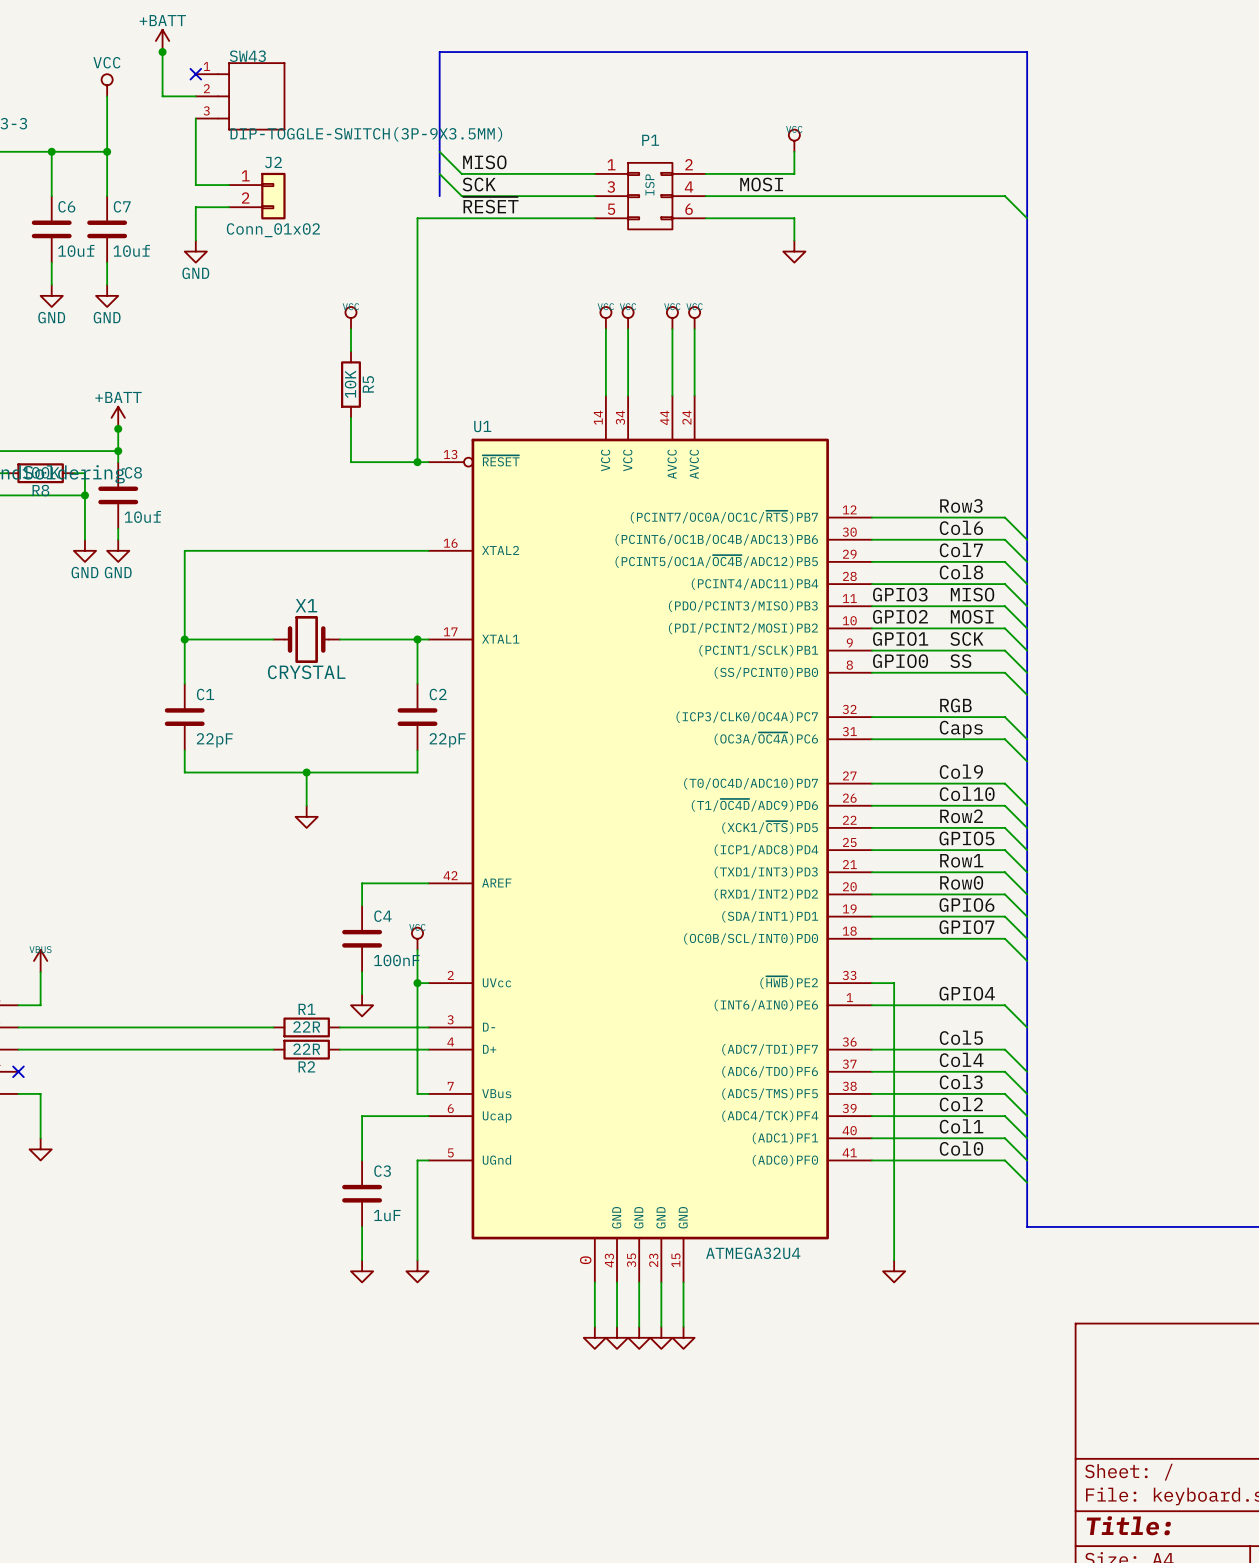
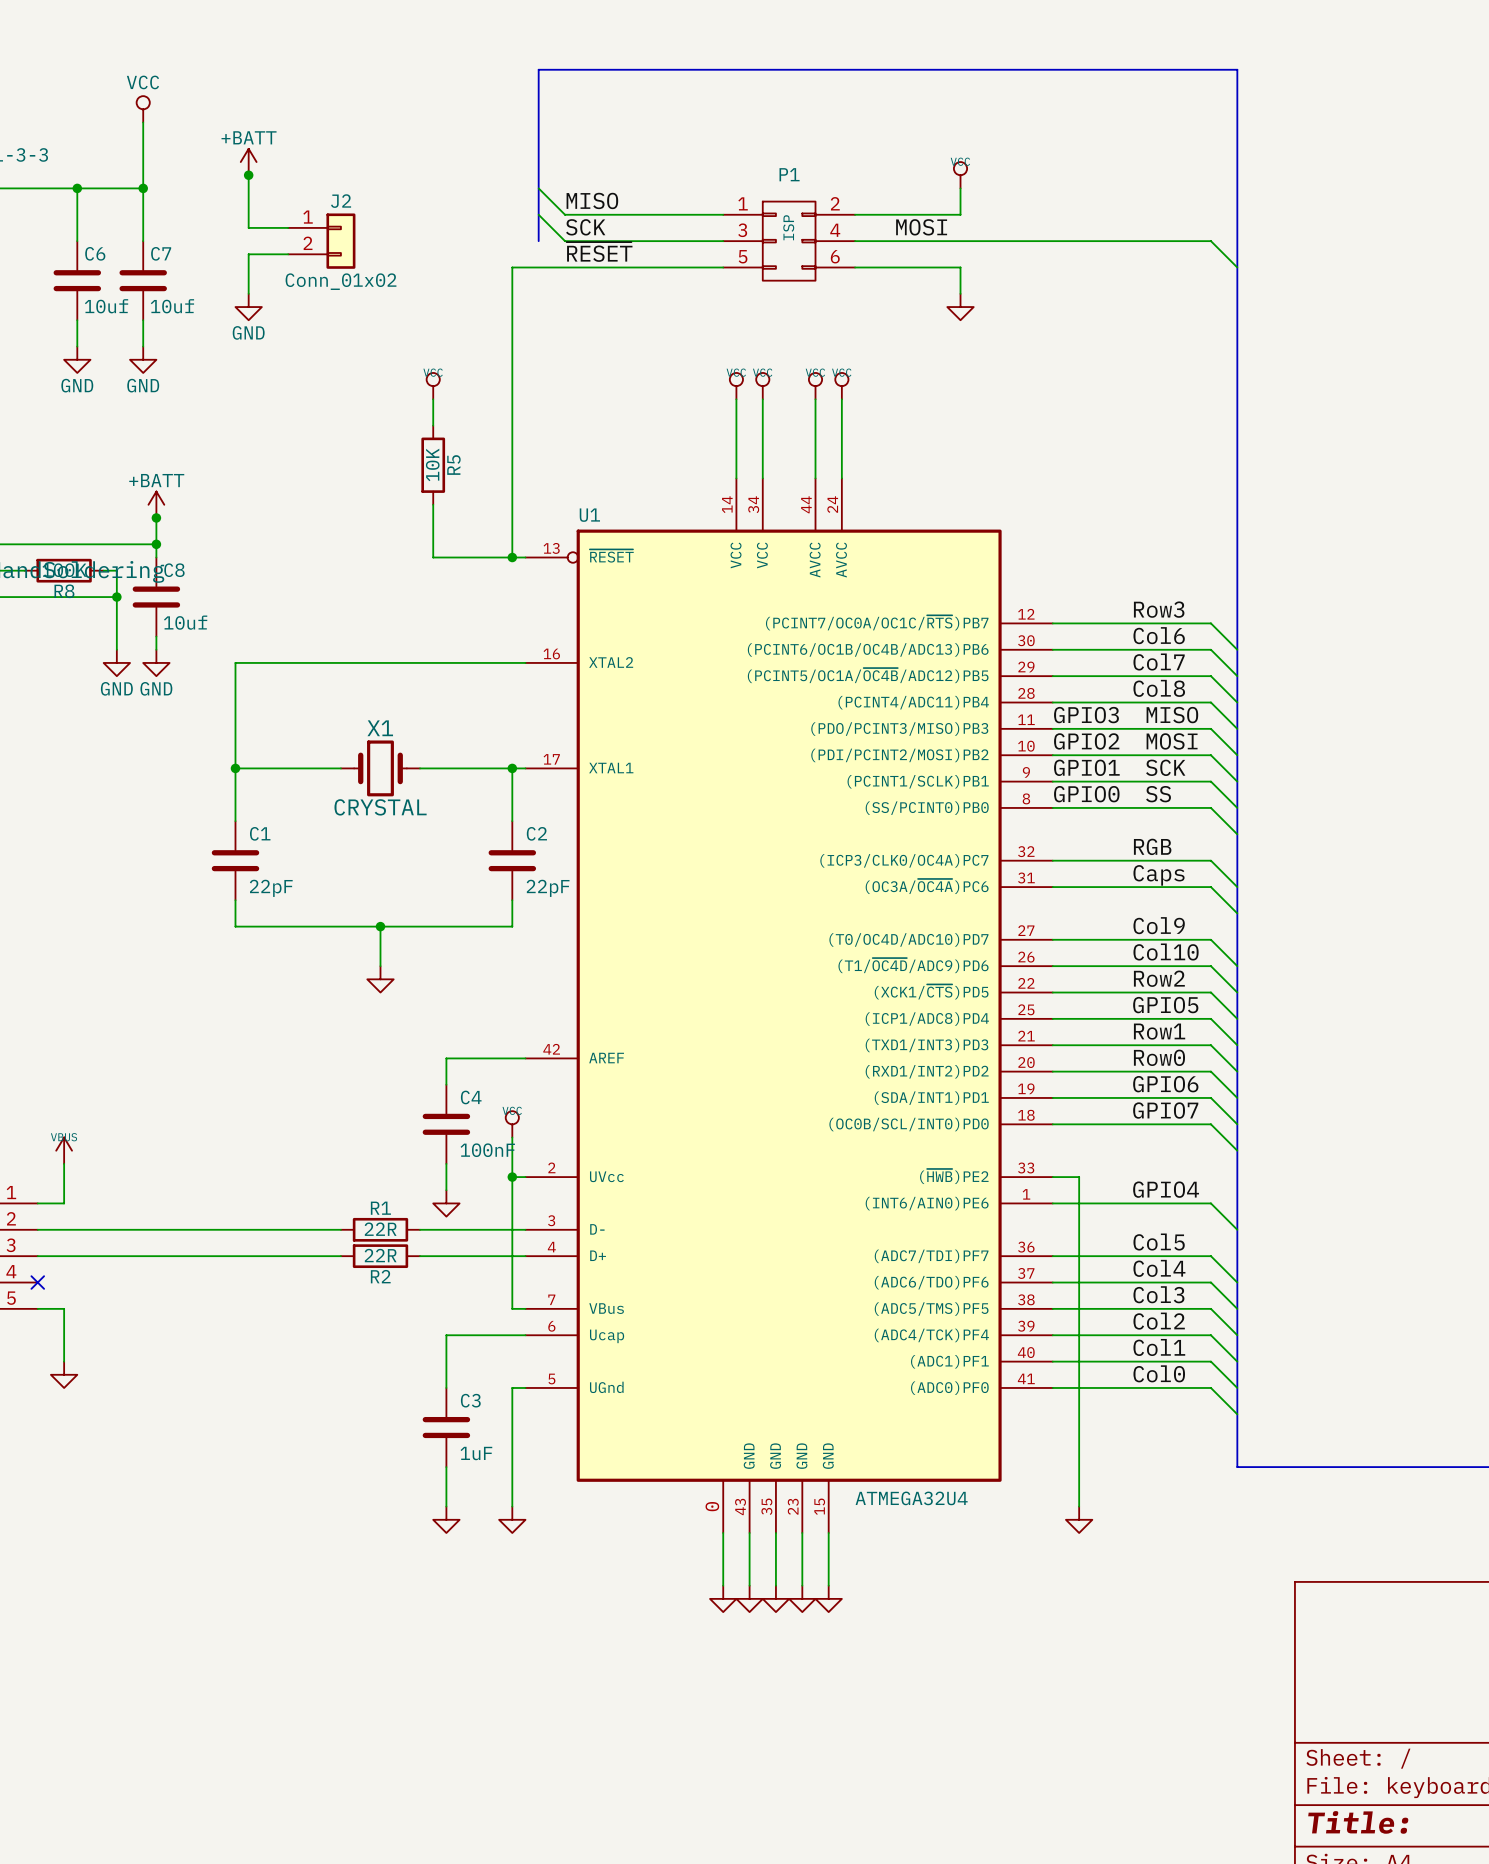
power symbol position: +BATT (162, 40) -> +BATT (248, 162)
wire: (162, 52) (162, 96) (195, 96) -> none
junction: (162, 52) -> none
no-connect mark: (195, 74) -> none
SW43: DIP-TOGGLE-SWITCH(3P-9X3.5MM) (240, 96) -> none
junction: none -> (248, 175)

